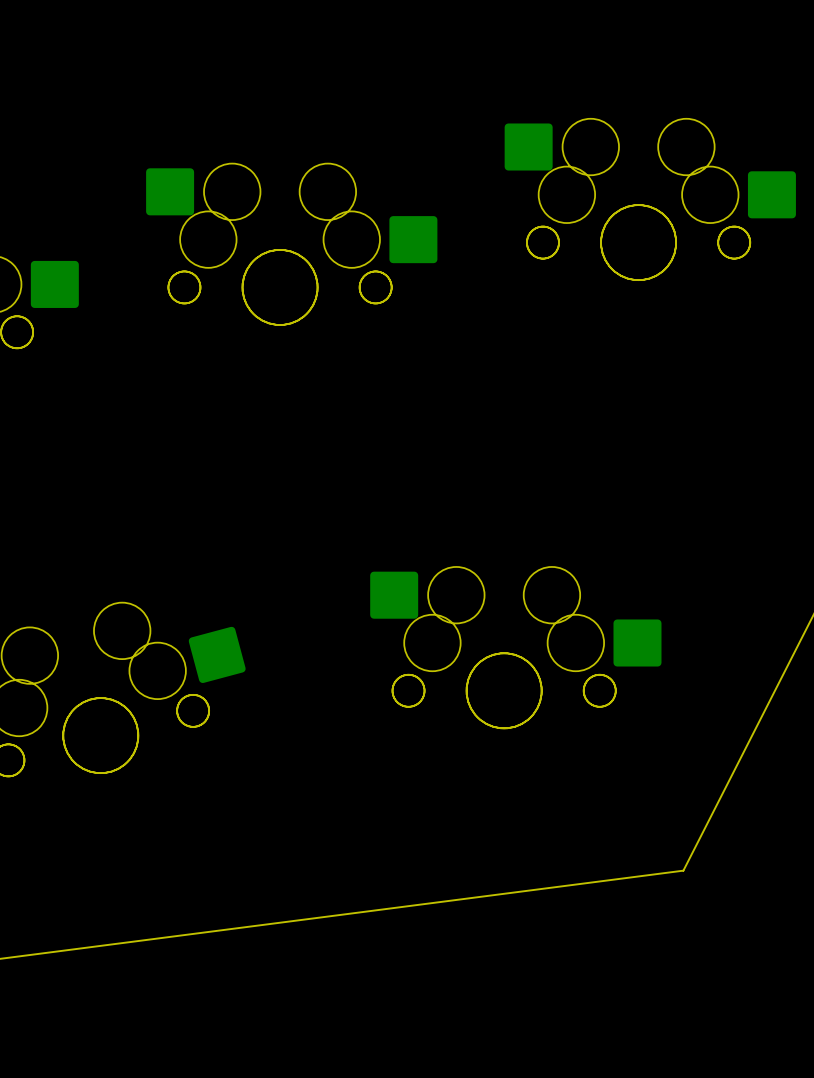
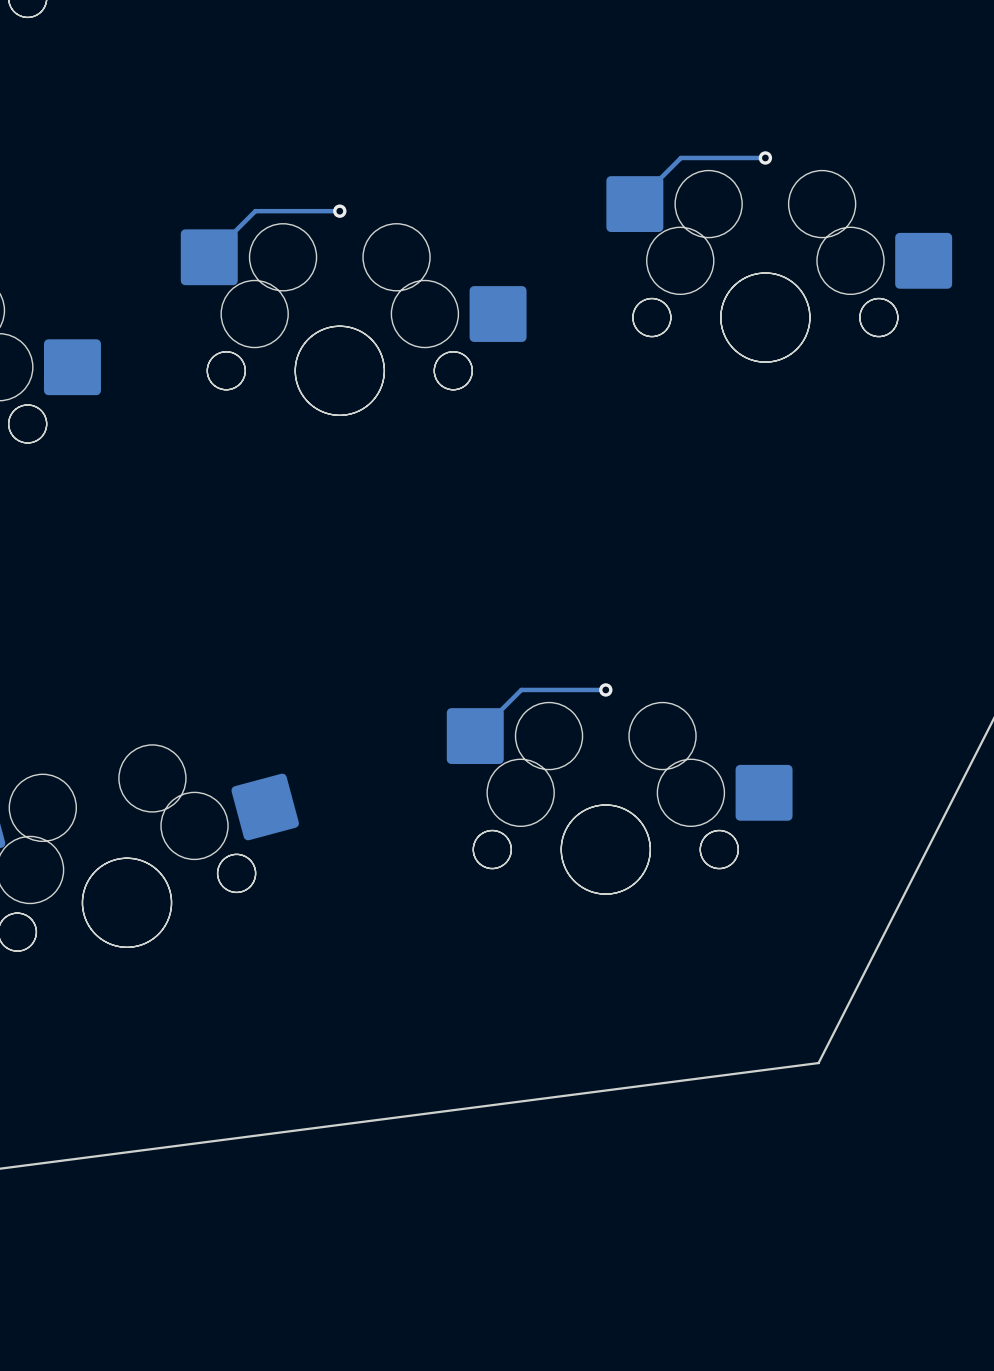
track: none -> (765, 157) (680, 157) (634, 204)
via: none -> (765, 157)
track: none -> (339, 211) (255, 211) (209, 257)
via: none -> (339, 211)
track: none -> (605, 689) (521, 689) (475, 736)
via: none -> (605, 689)

